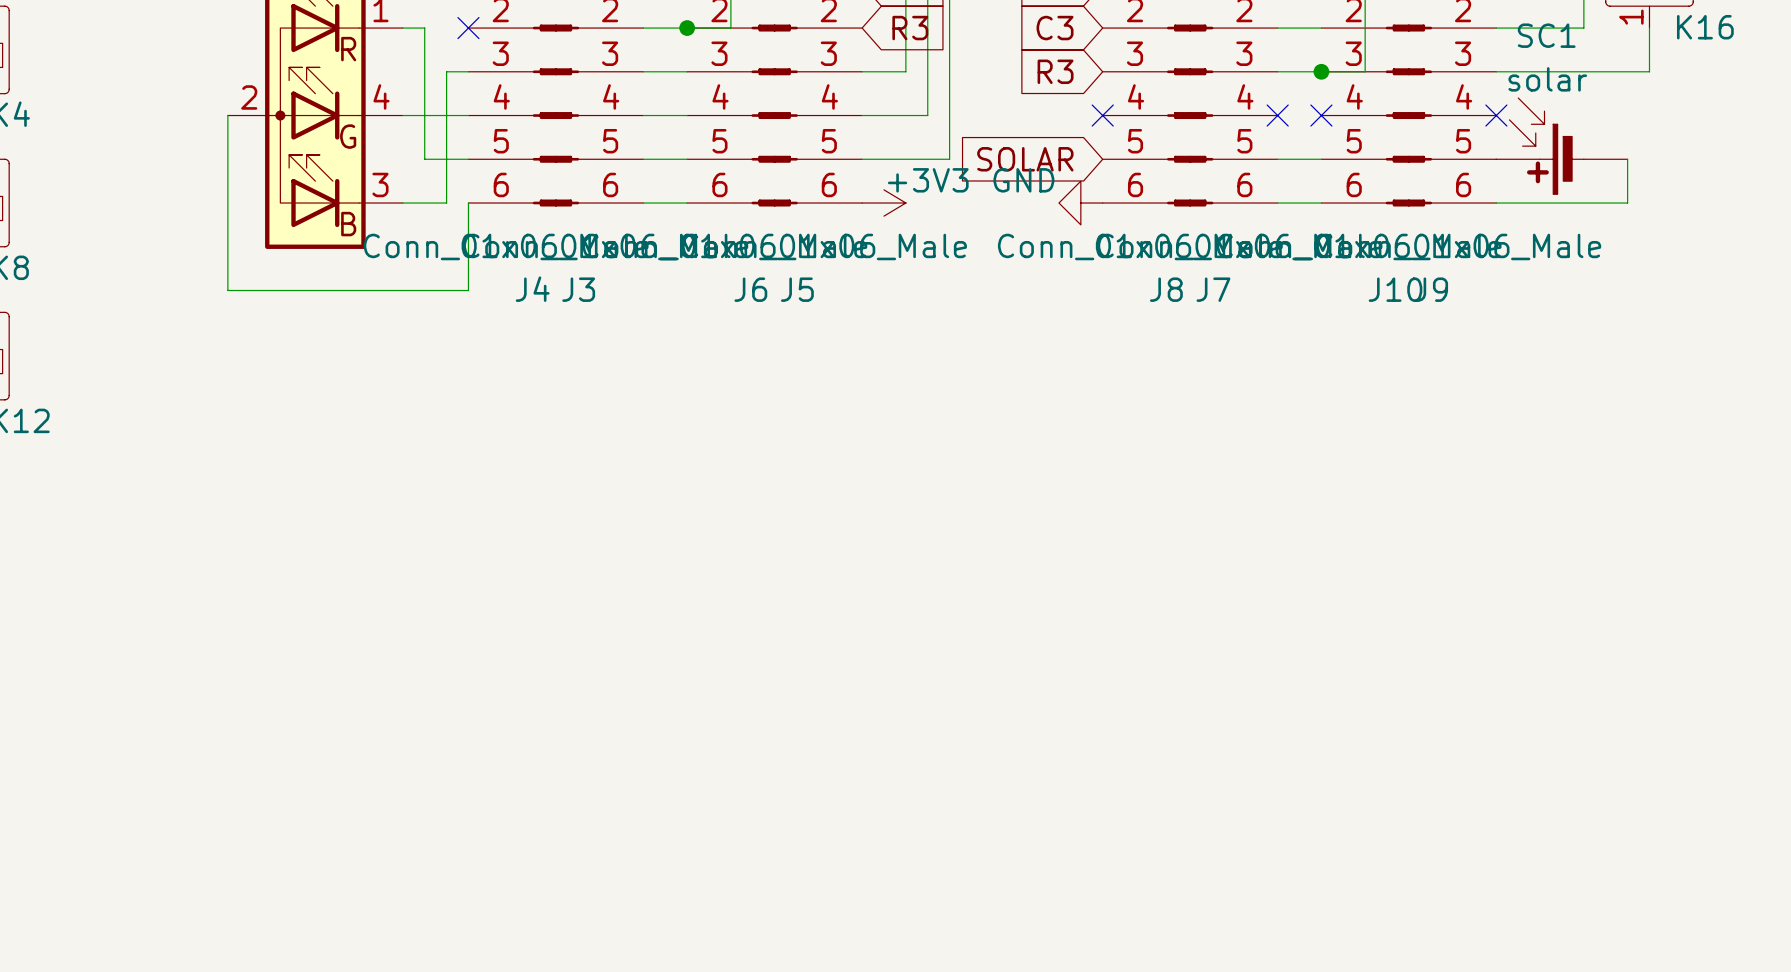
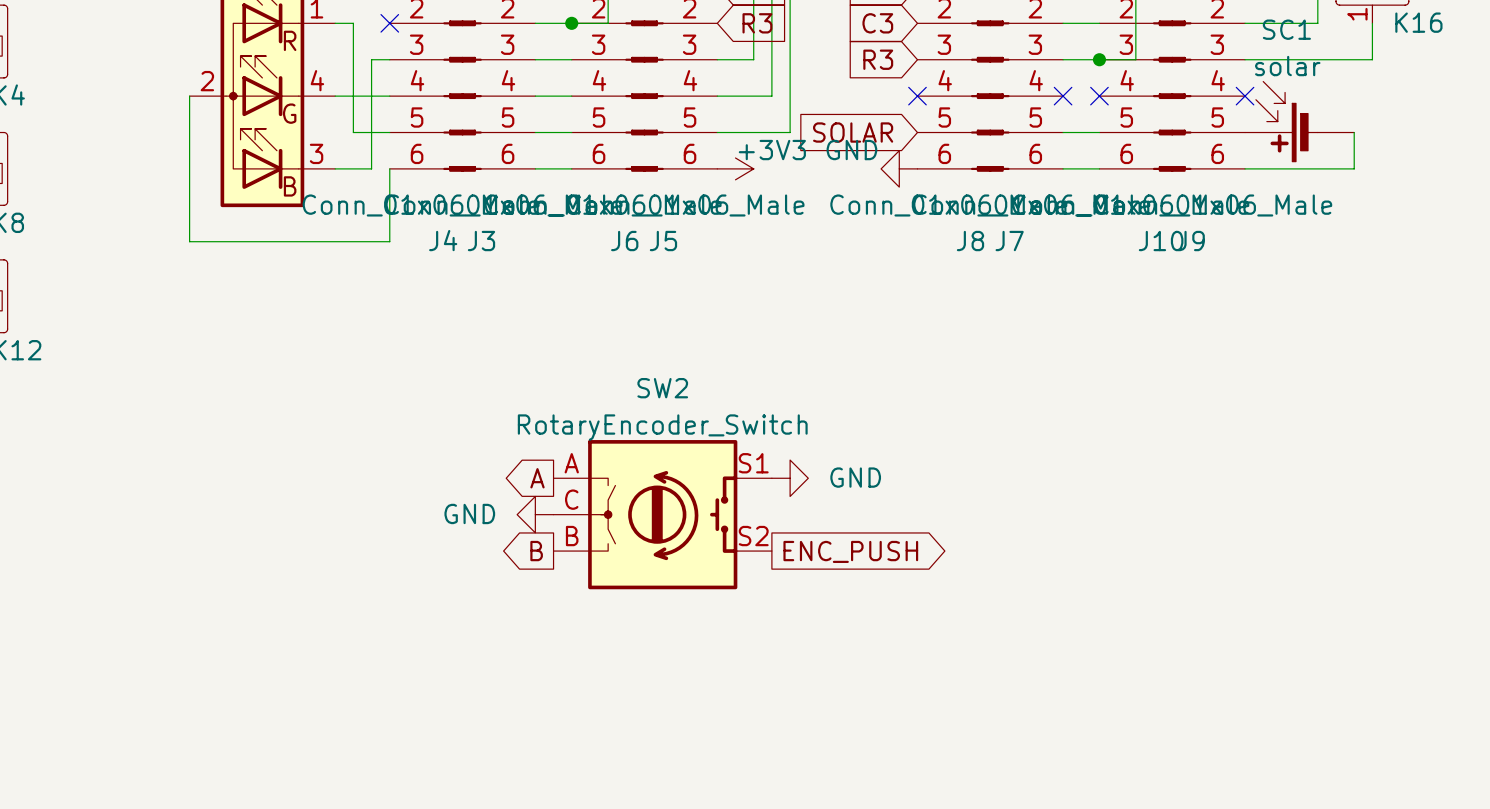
global label: none -> A (537, 478)
power symbol: none -> GND (790, 478)
power symbol: none -> GND (535, 514)
SW2: none -> RotaryEncoder_Switch (662, 514)
global label: none -> B (536, 551)
global label: none -> ENC_PUSH (850, 551)

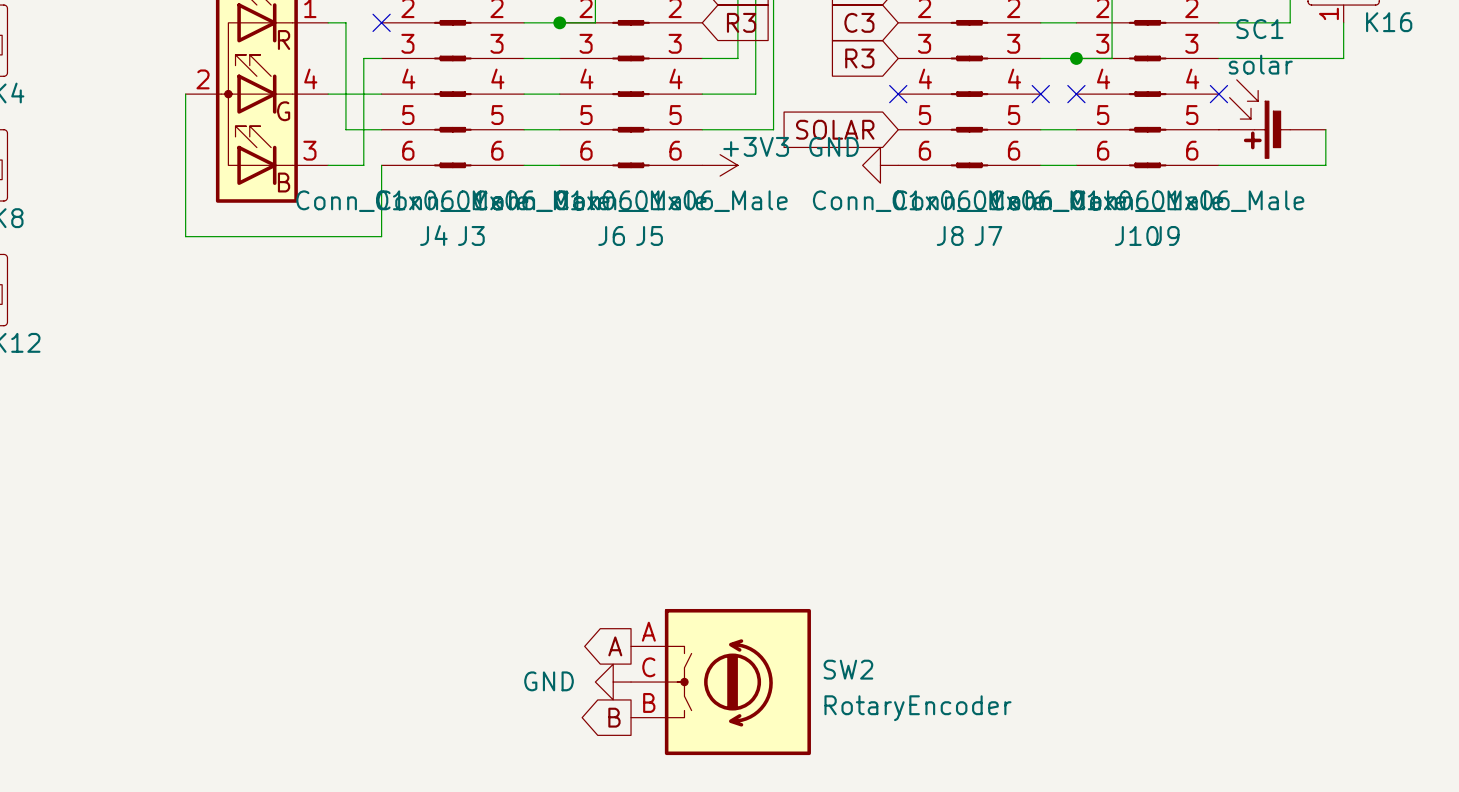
SW2 name position: SW2 (662, 388) -> SW2 (848, 669)
SW2 value: RotaryEncoder_Switch (662, 427) -> RotaryEncoder (917, 708)
SW2 symbol: [553, 440, 772, 590] -> [631, 608, 811, 756]
global label position: A (537, 478) -> A (615, 646)
power symbol: GND (790, 478) -> none
power symbol: GND (535, 514) -> none
global label position: B (536, 551) -> B (614, 717)
global label: ENC_PUSH (850, 551) -> none
power symbol: none -> GND (613, 682)

